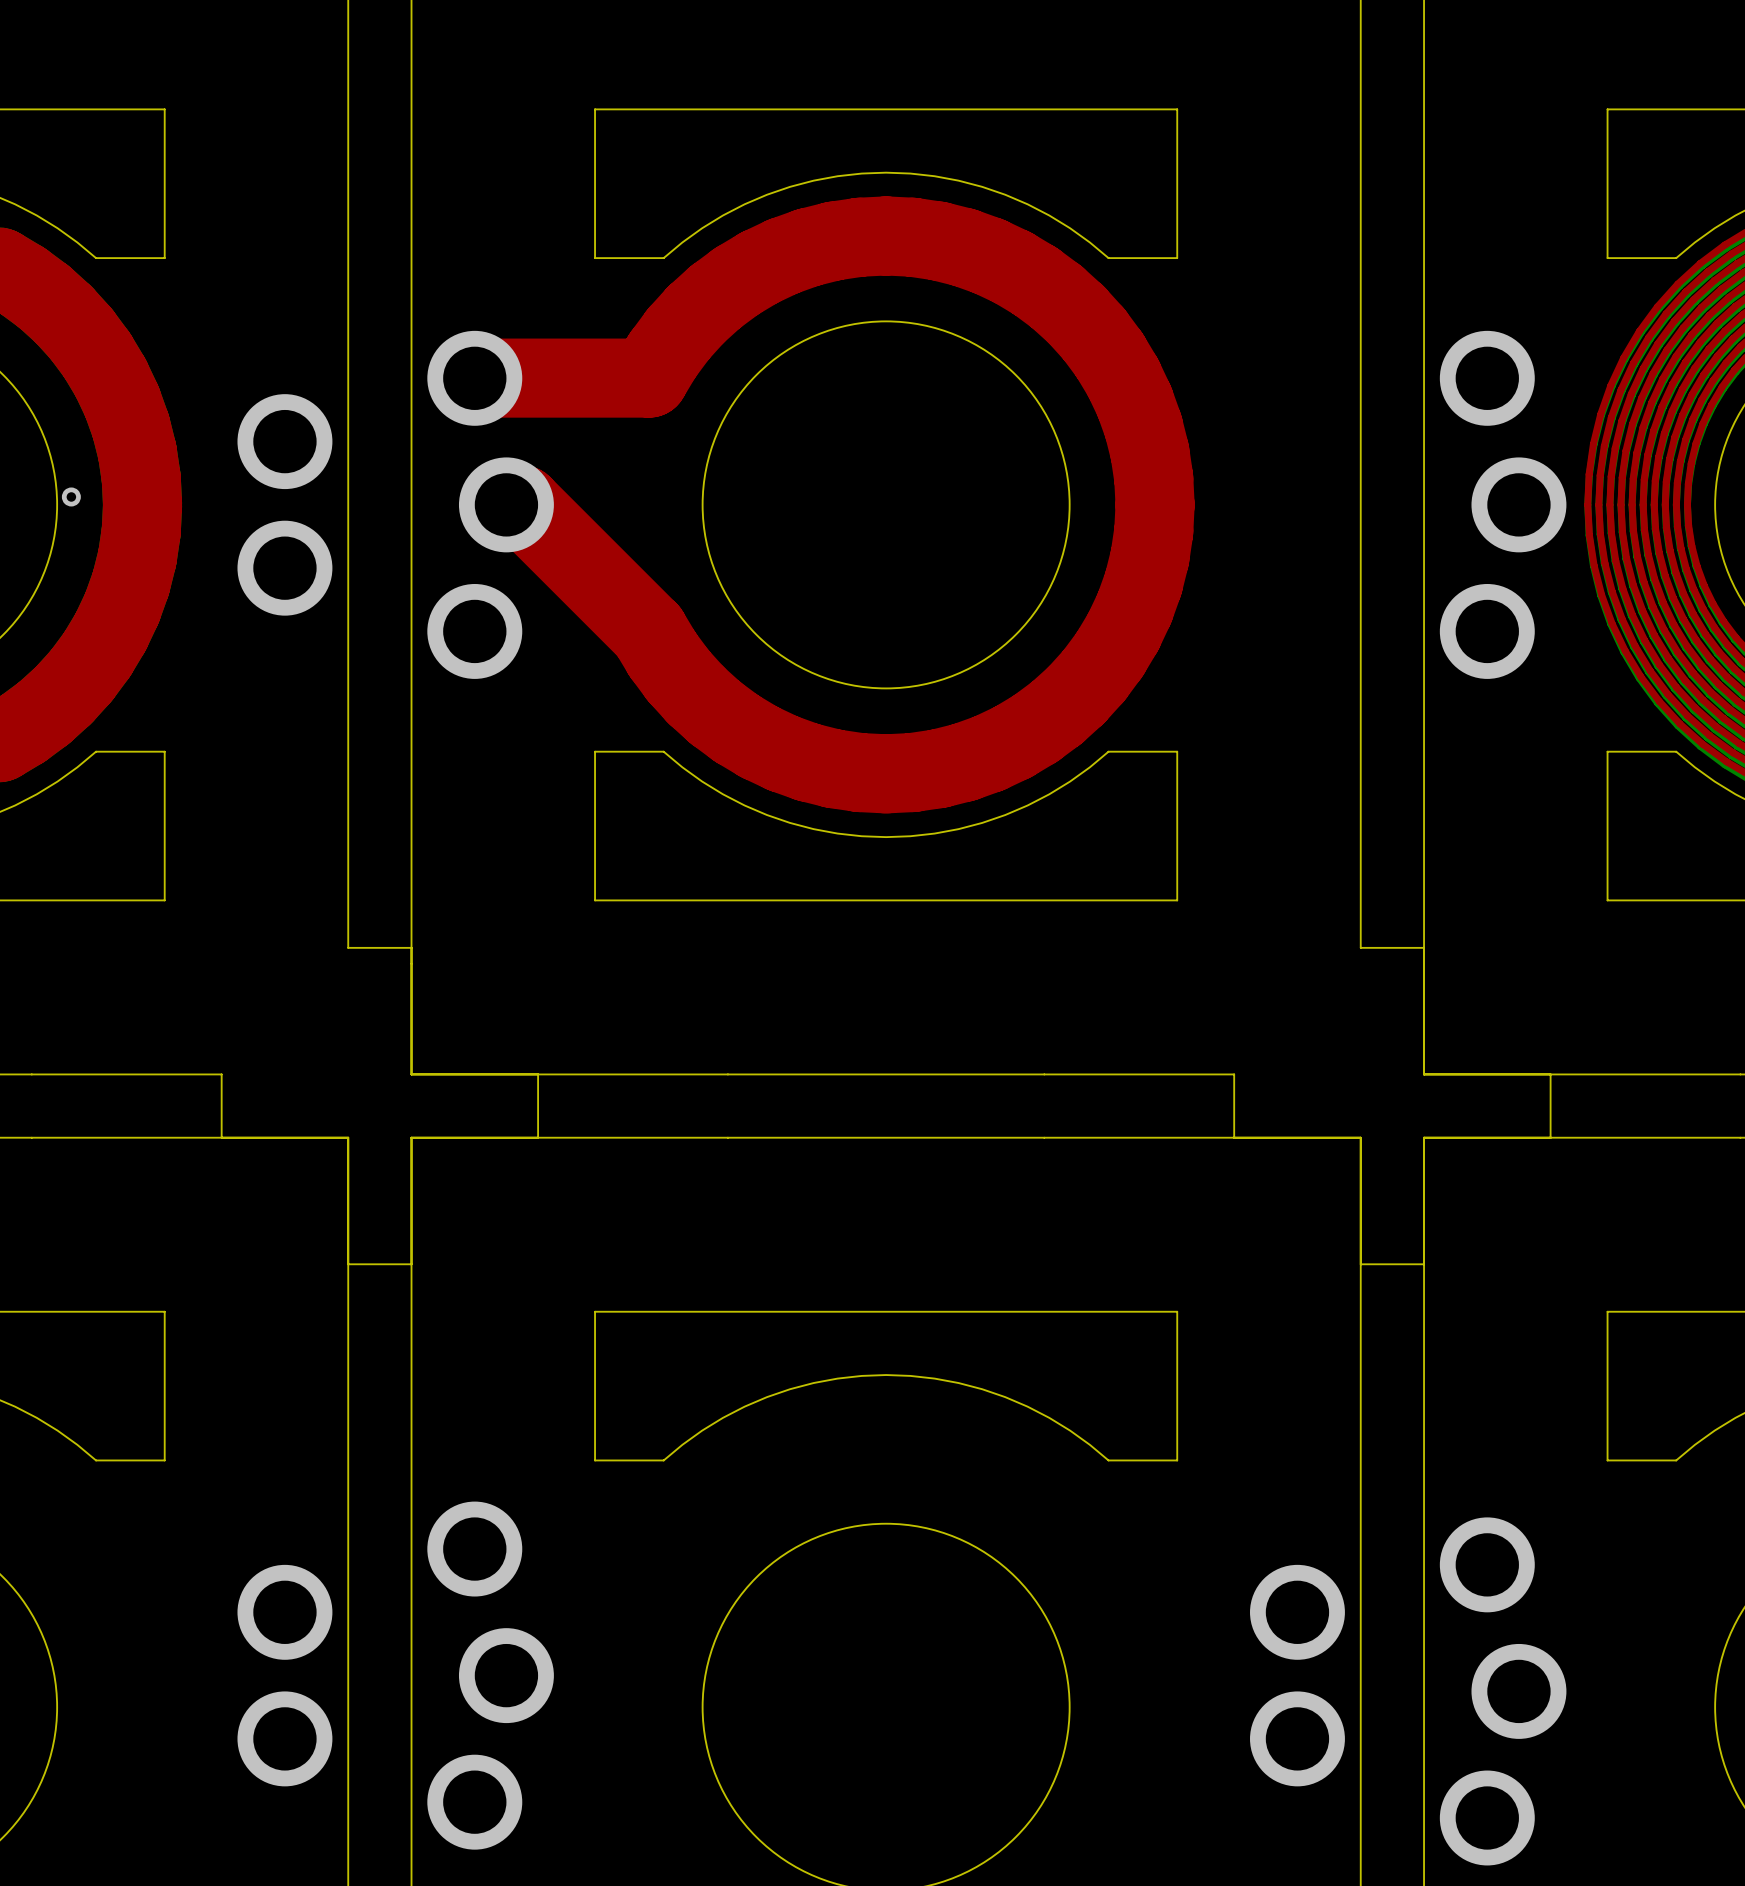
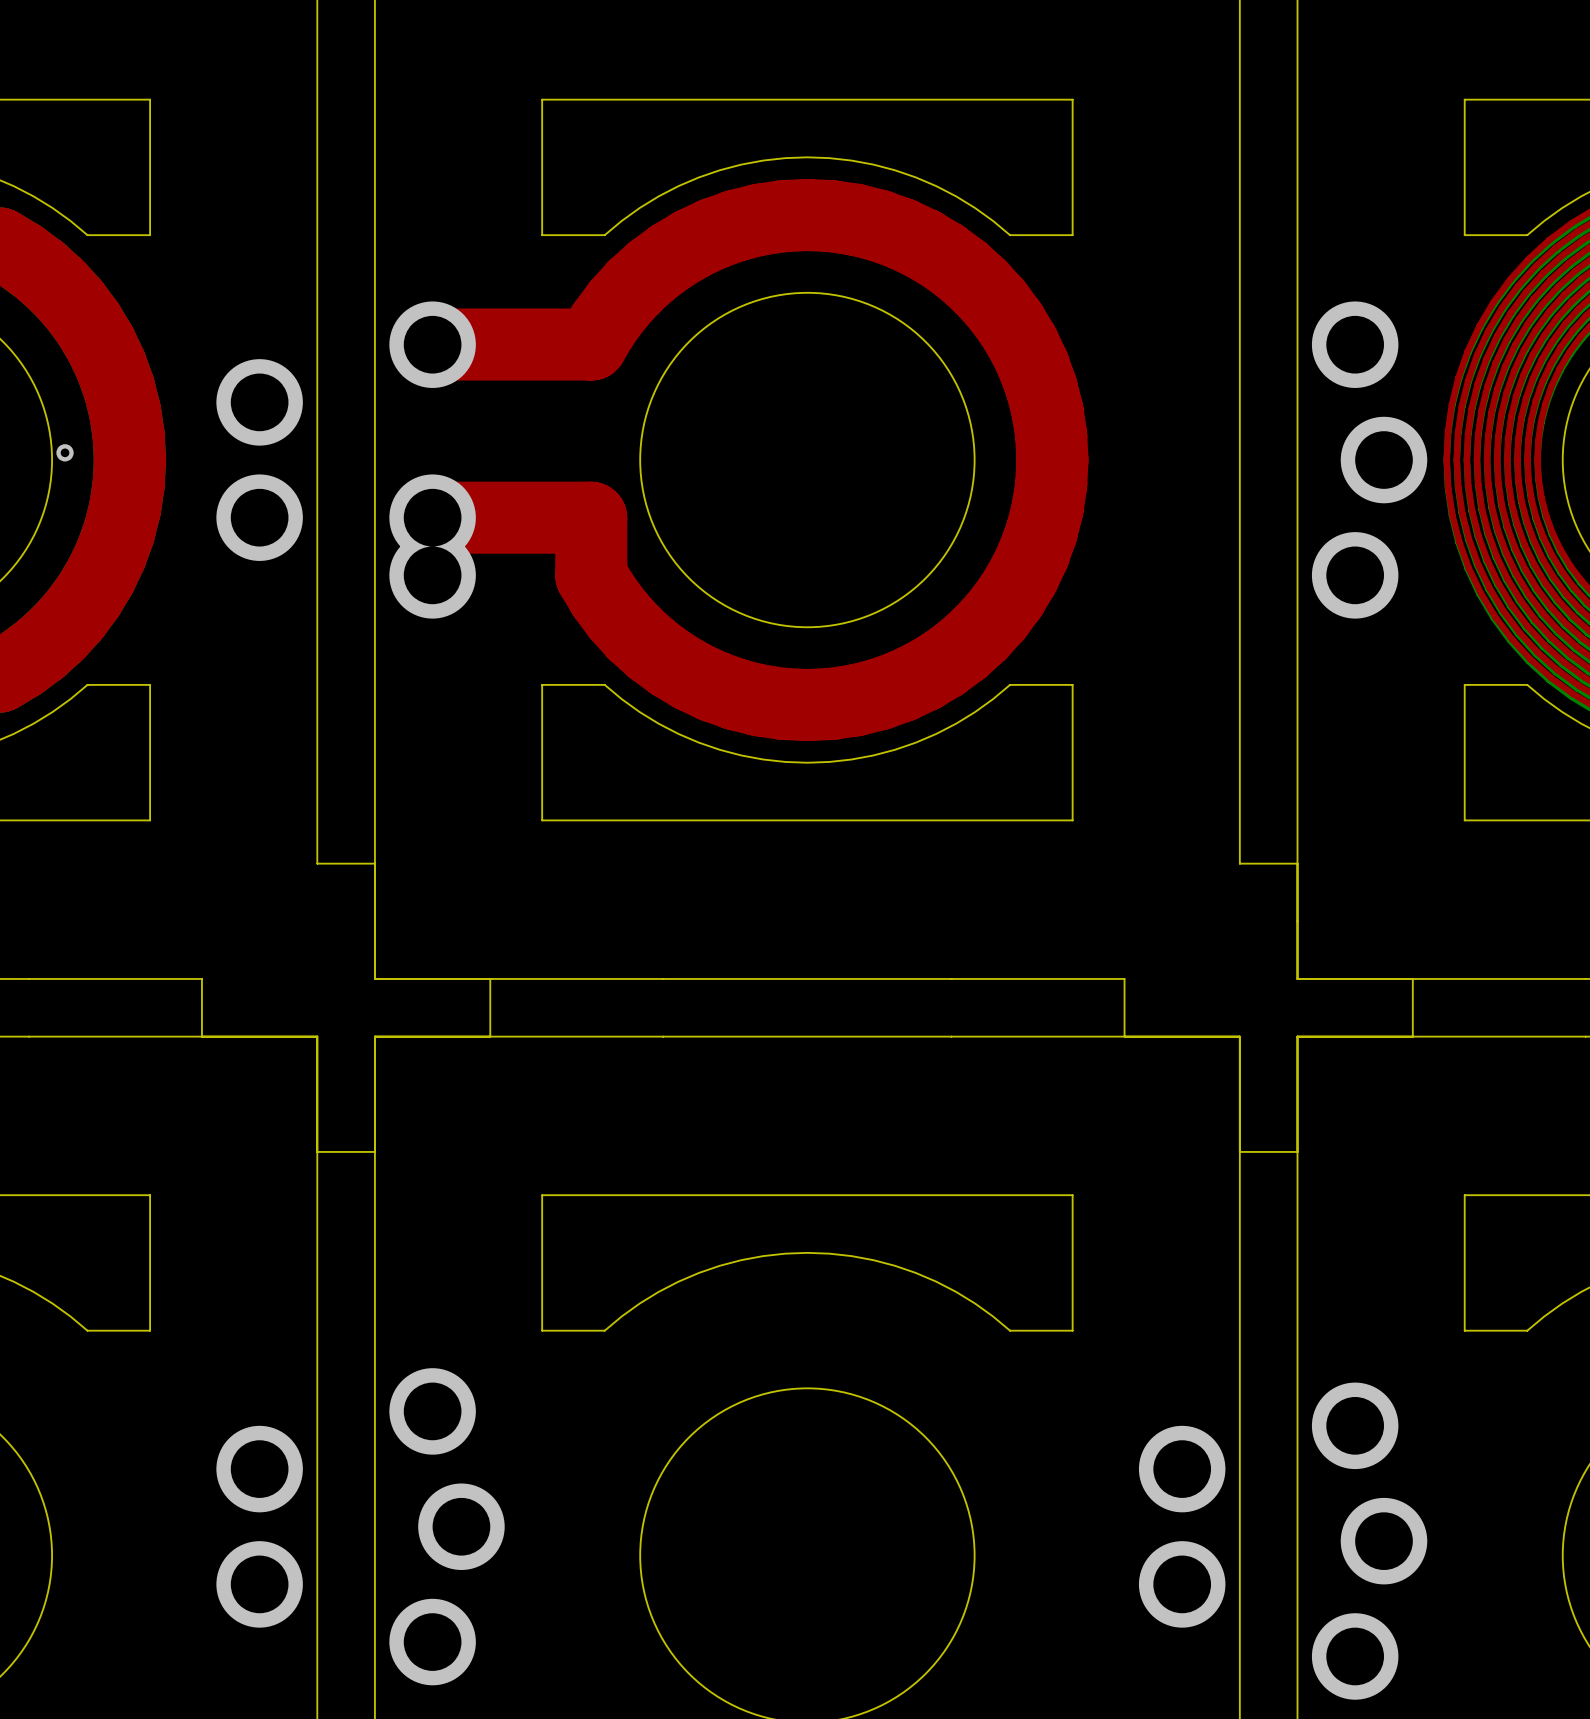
top track: (506, 504) (522, 504) (648, 631) -> (432, 517) (590, 517) (591, 575)
via position: (506, 504) -> (432, 517)

